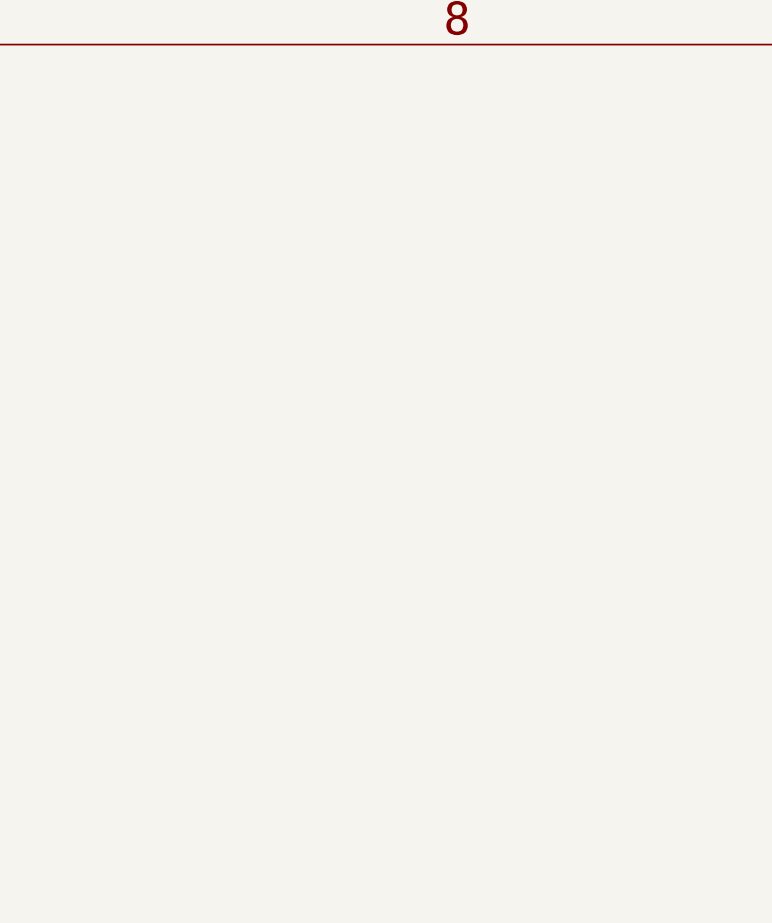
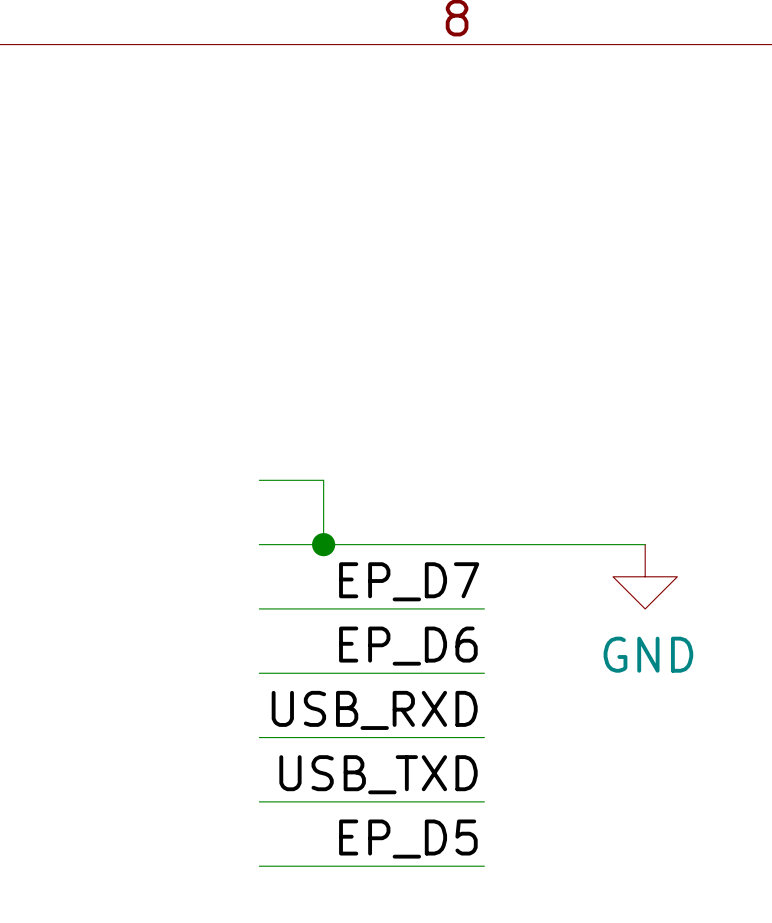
wire: none -> (259, 480) (323, 480) (323, 544)
wire: none -> (259, 544) (645, 544)
junction: none -> (323, 544)
power symbol: none -> GND (645, 576)
label: none -> EP_D7 (409, 581)
wire: none -> (259, 608) (484, 608)
label: none -> EP_D6 (408, 646)
wire: none -> (259, 673) (484, 673)
label: none -> USB_RXD (374, 710)
wire: none -> (259, 737) (484, 737)
label: none -> USB_TXD (378, 774)
wire: none -> (259, 801) (484, 801)
label: none -> EP_D5 (408, 839)
wire: none -> (259, 866) (484, 866)

